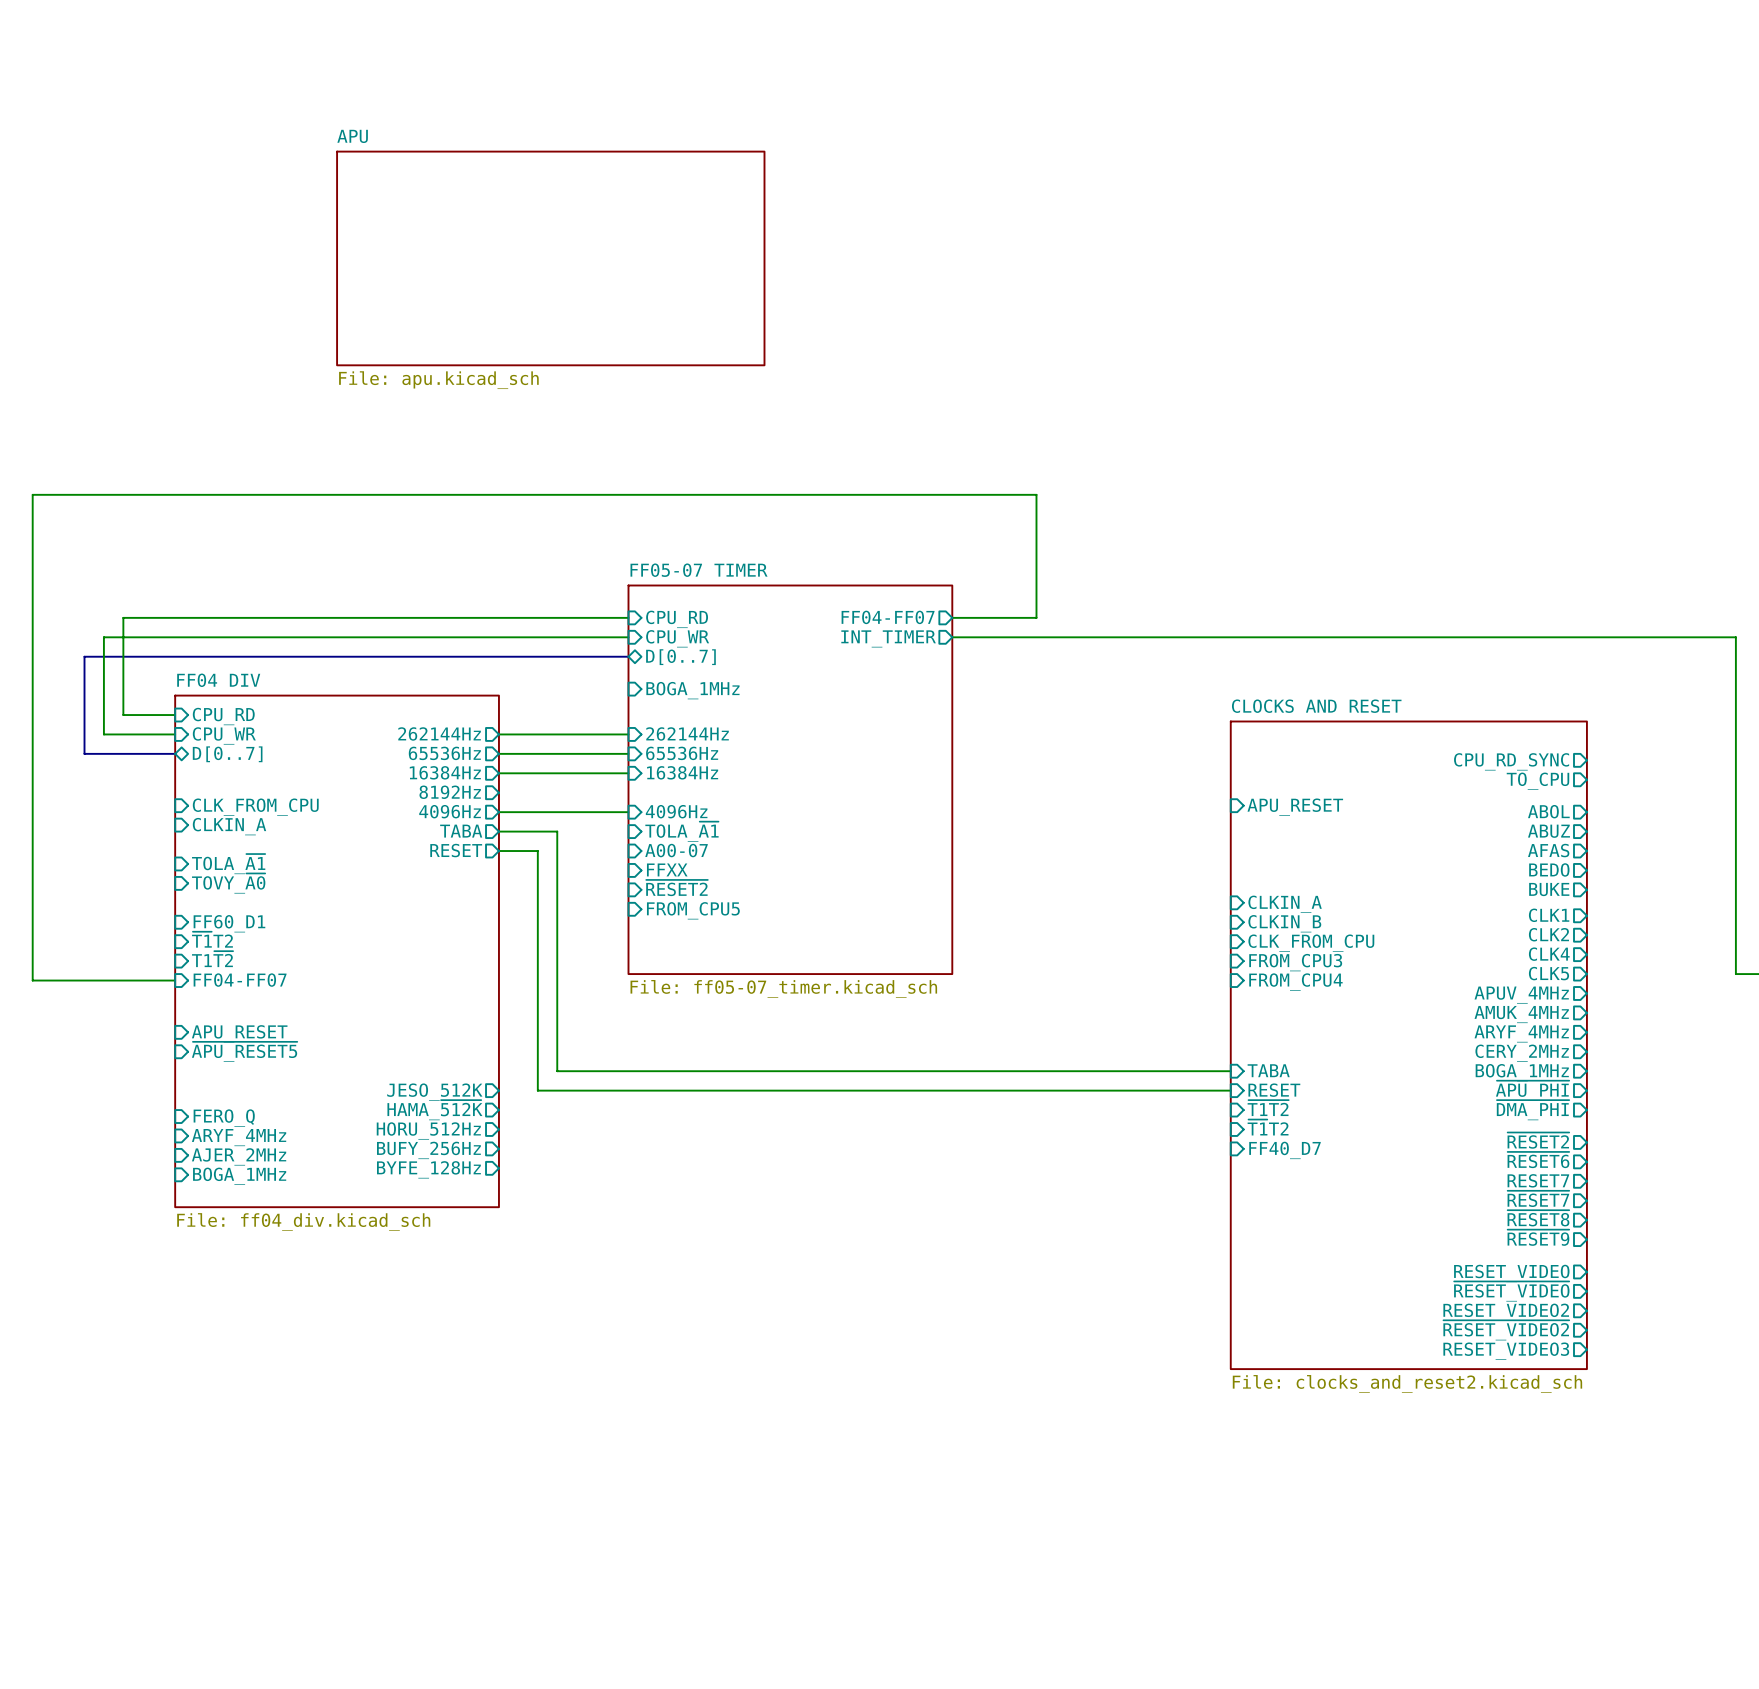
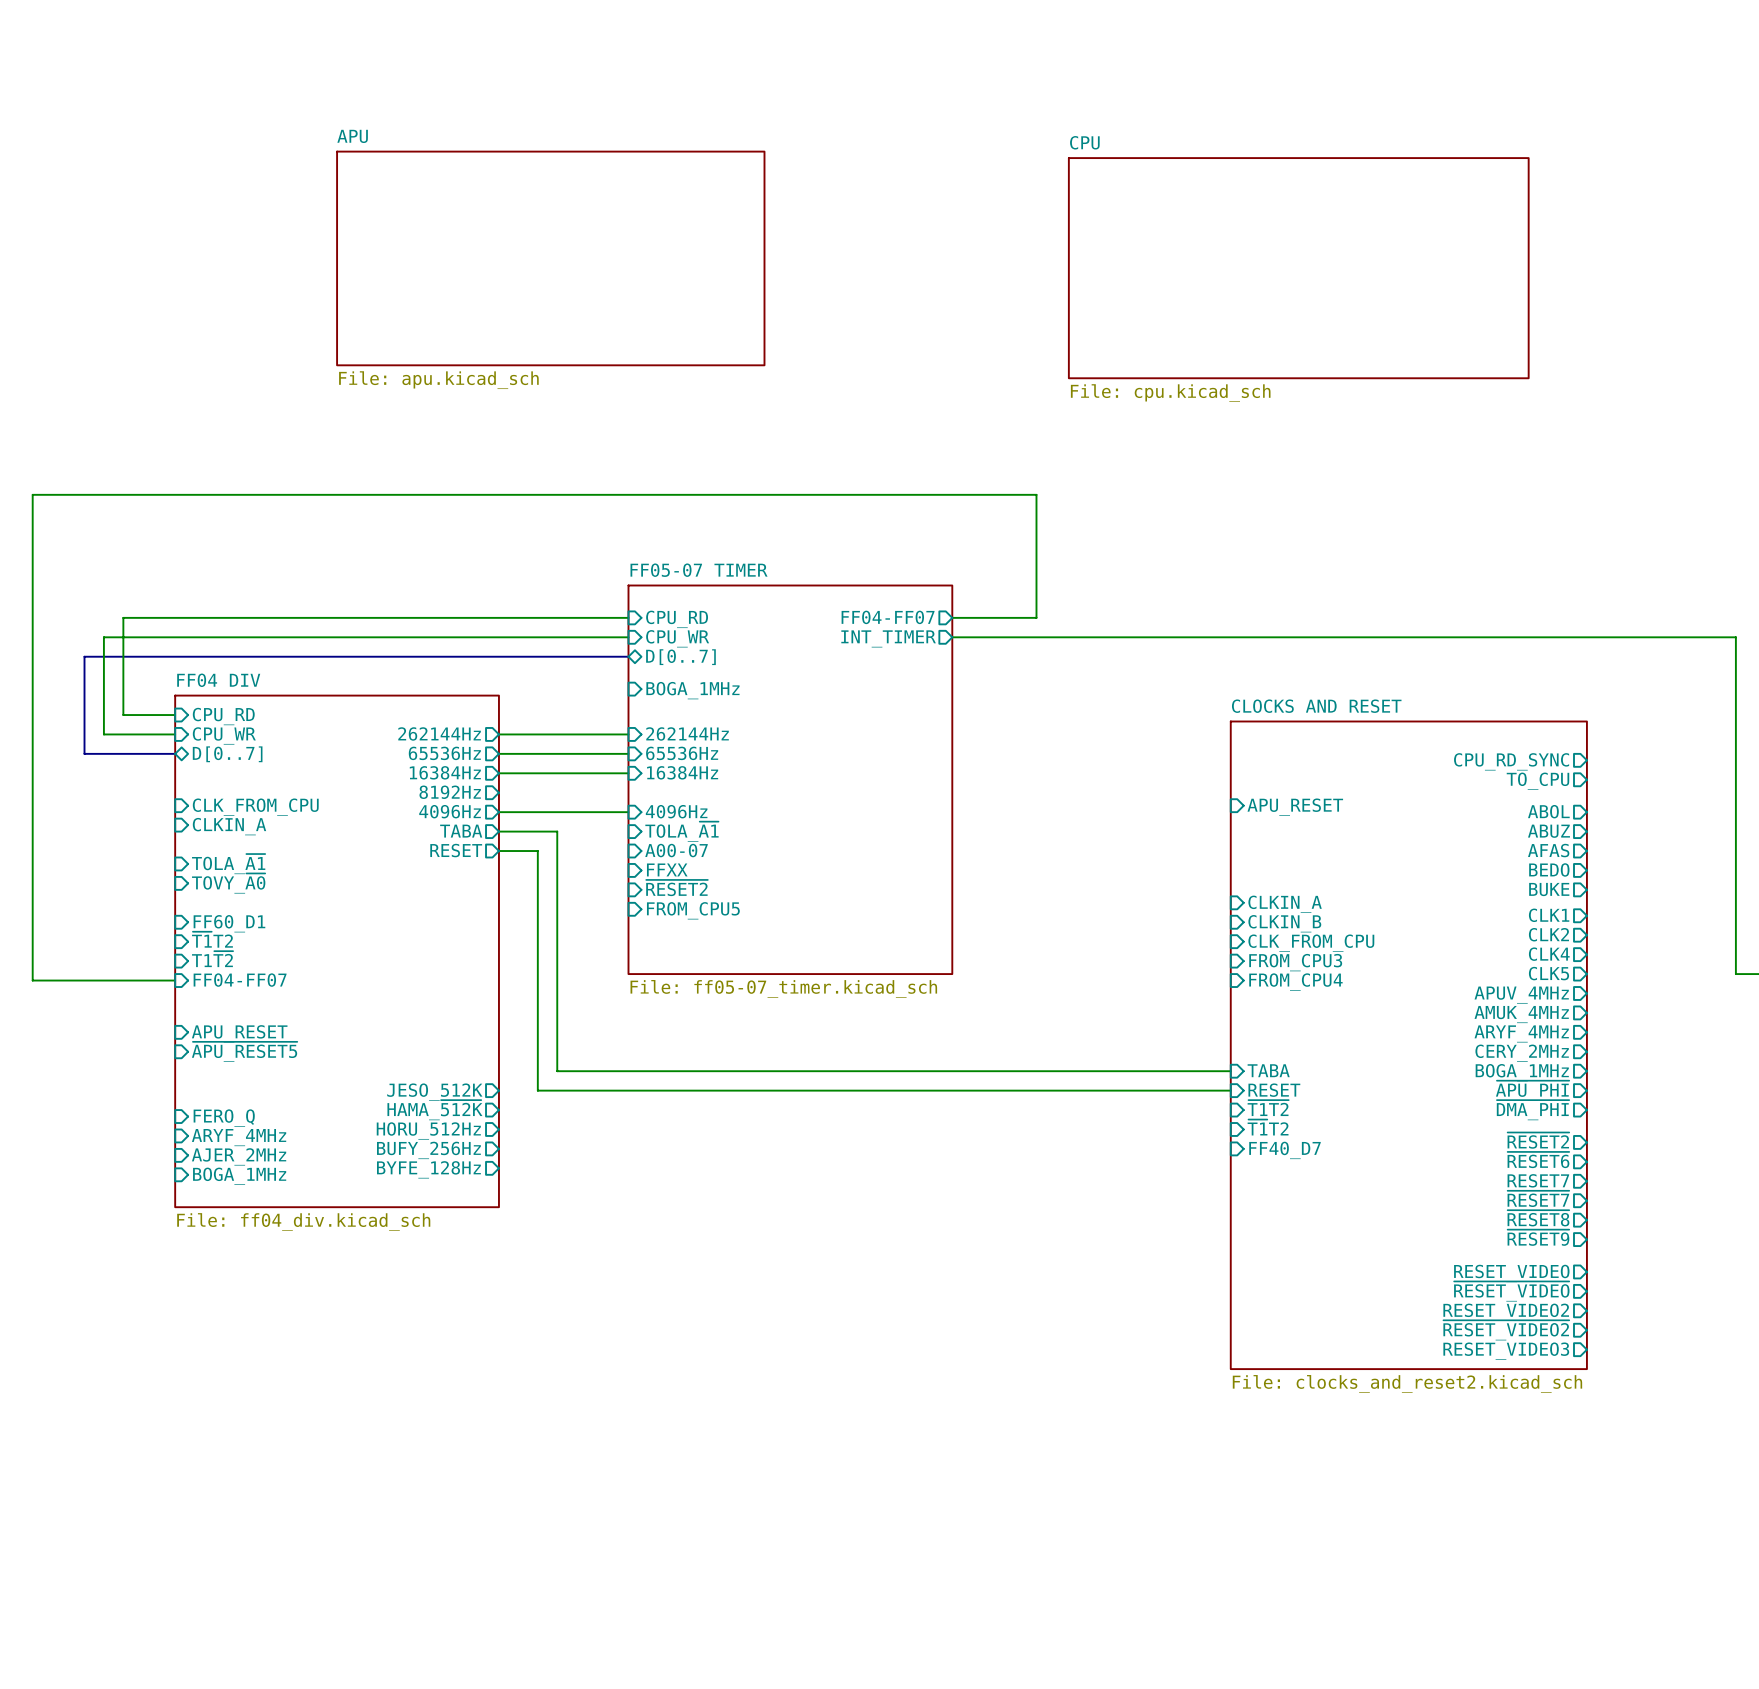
sheet CPU: none -> File: cpu.kicad_sch (1298, 268)

